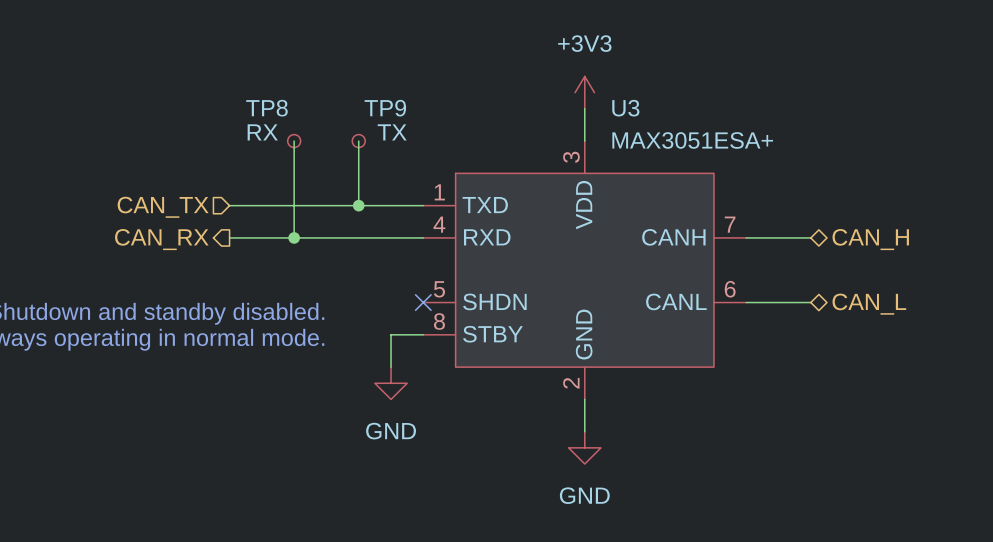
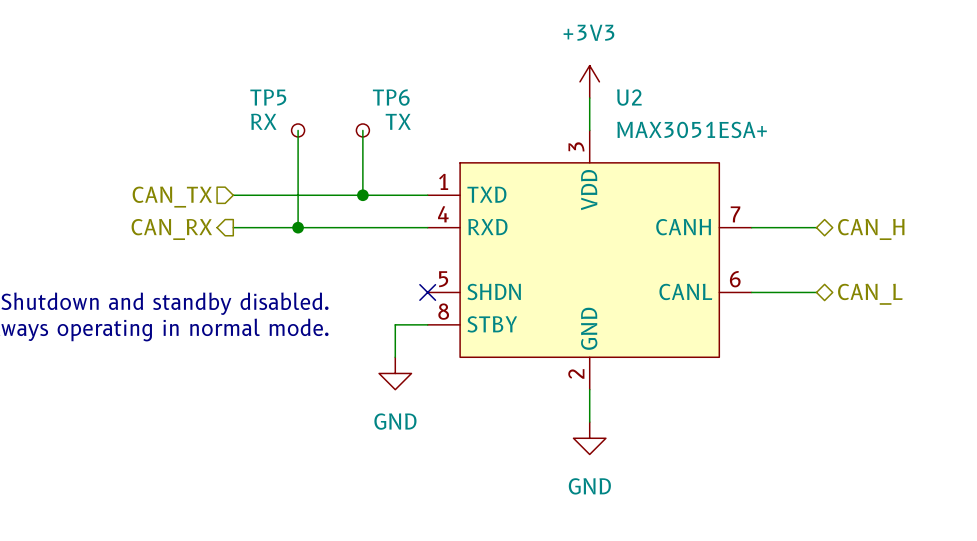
TP8 name: TP8 (266, 108) -> TP5 (268, 97)
TP9 name: TP9 (385, 108) -> TP6 (391, 97)
U3 name: U3 (625, 108) -> U2 (629, 97)

